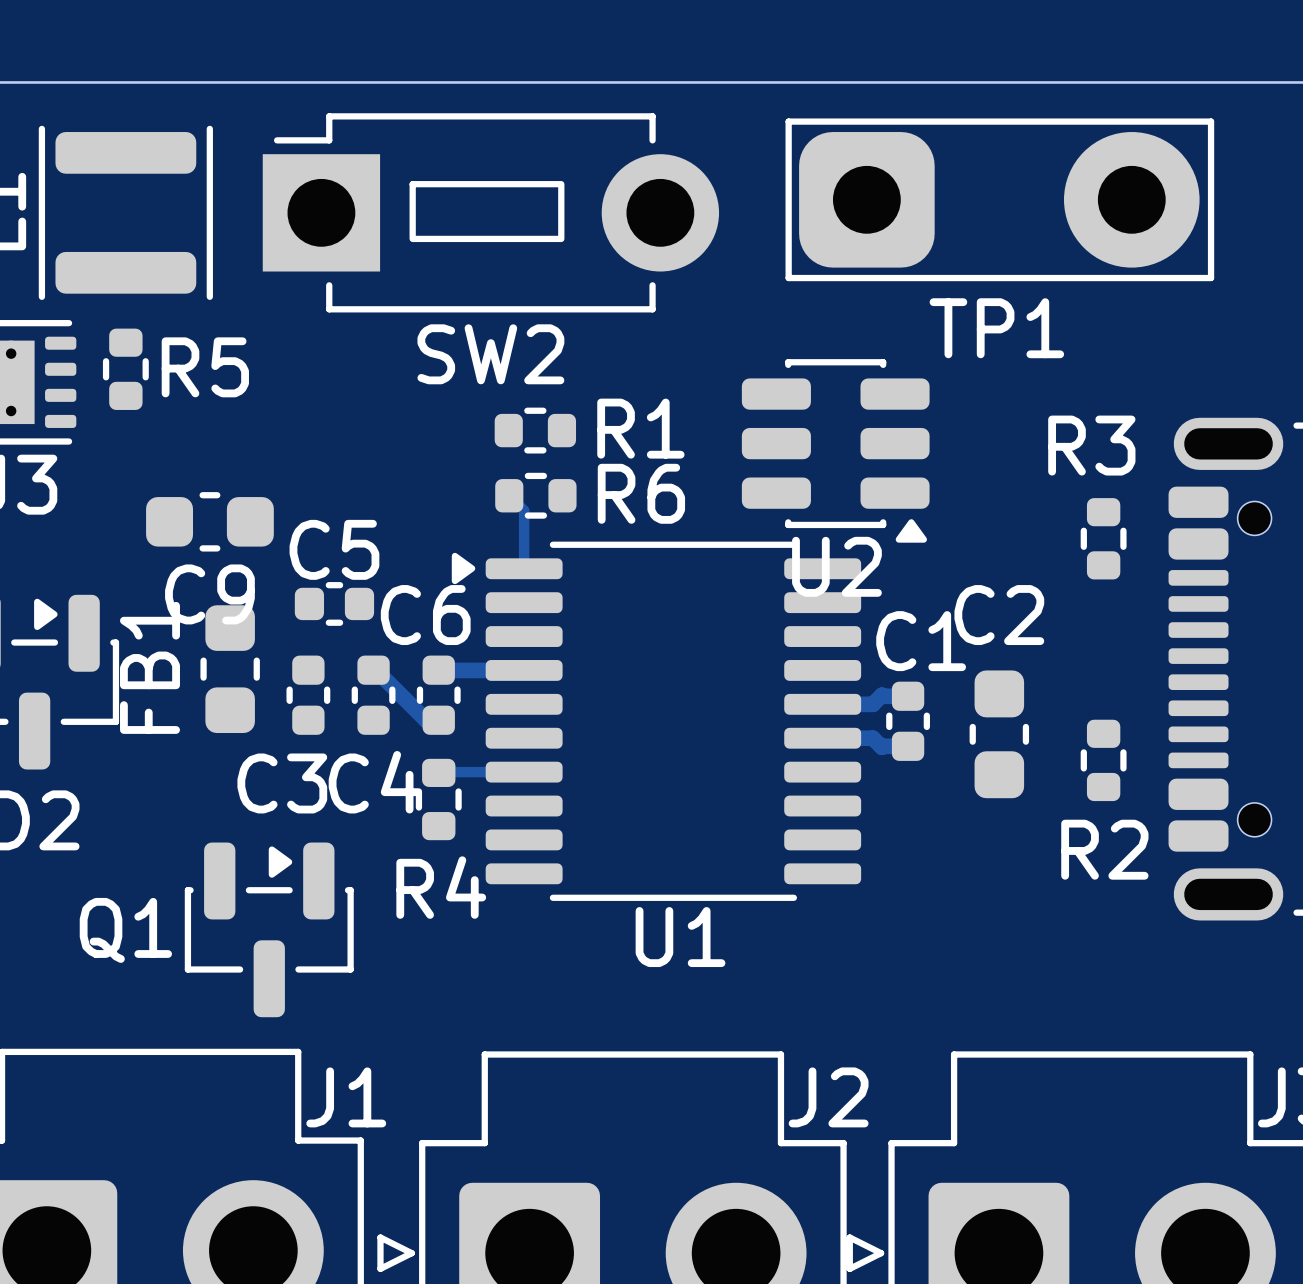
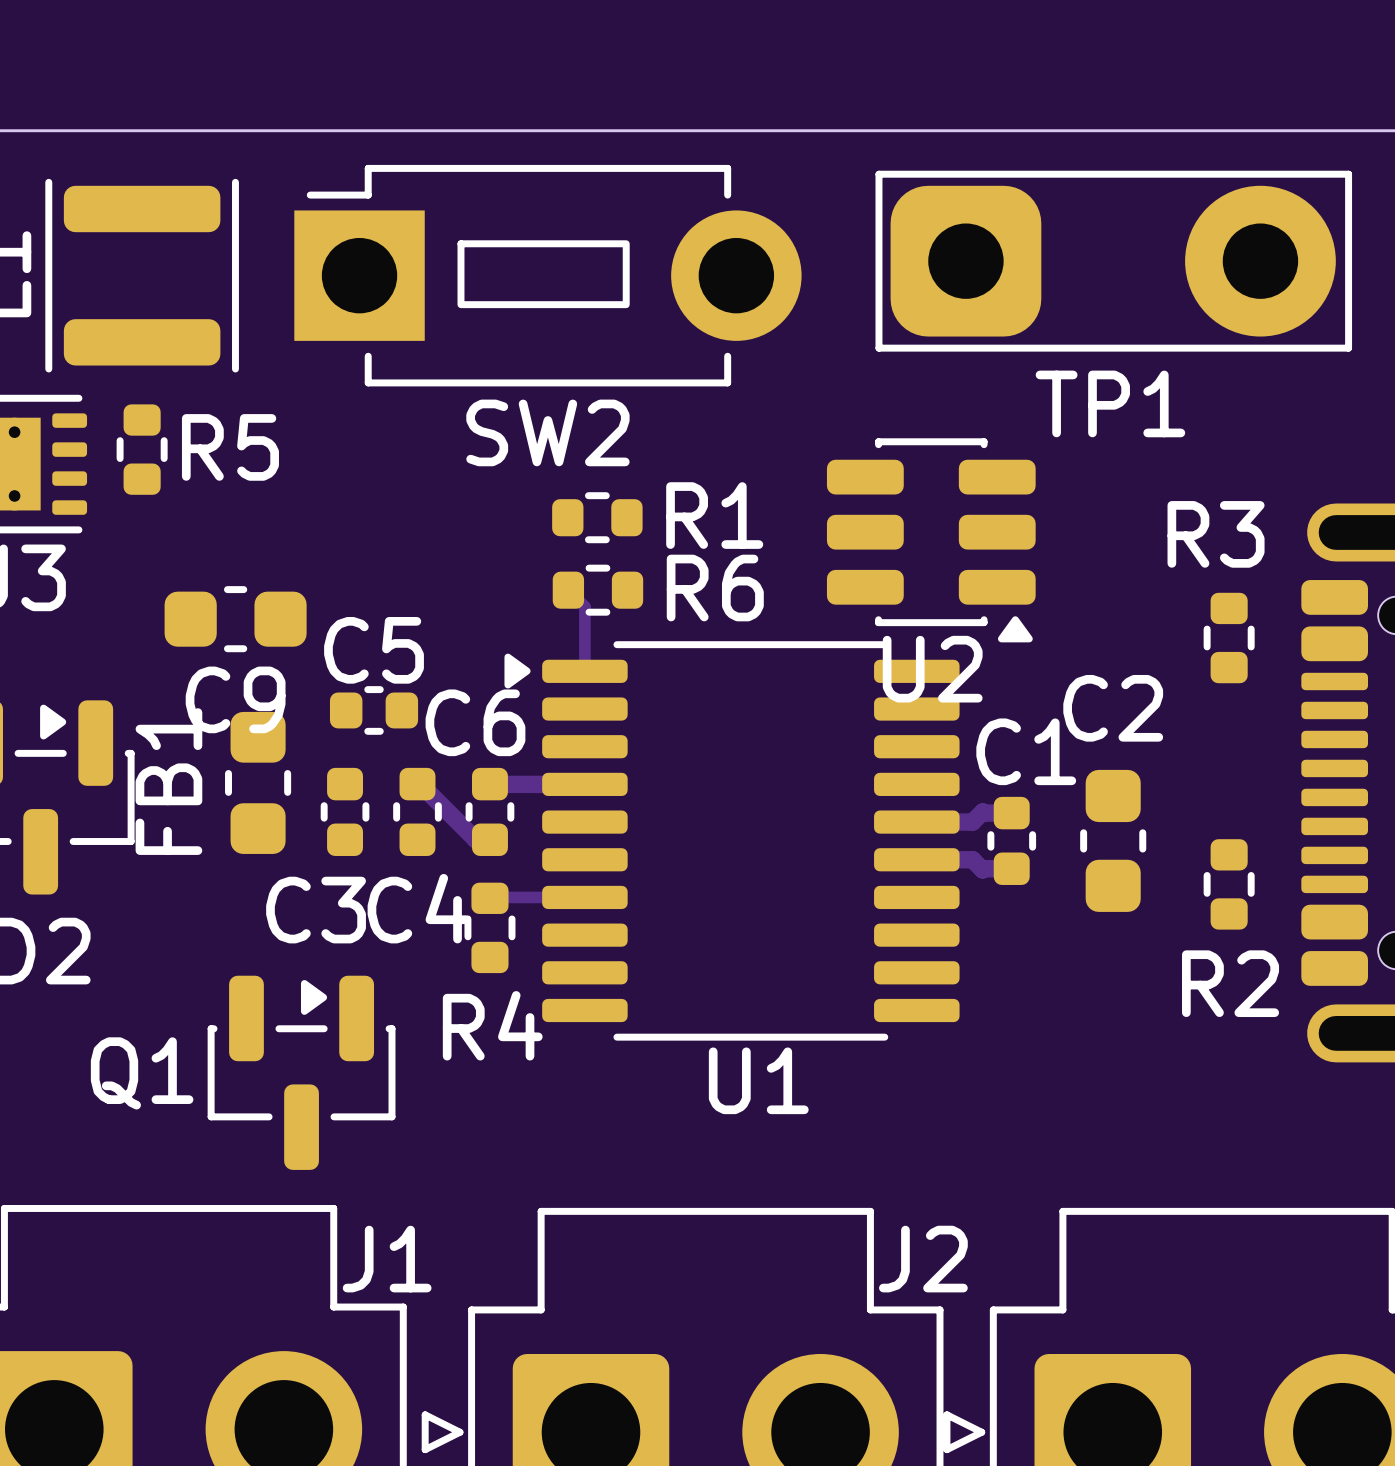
C2 position: (999, 734) -> (1113, 840)

